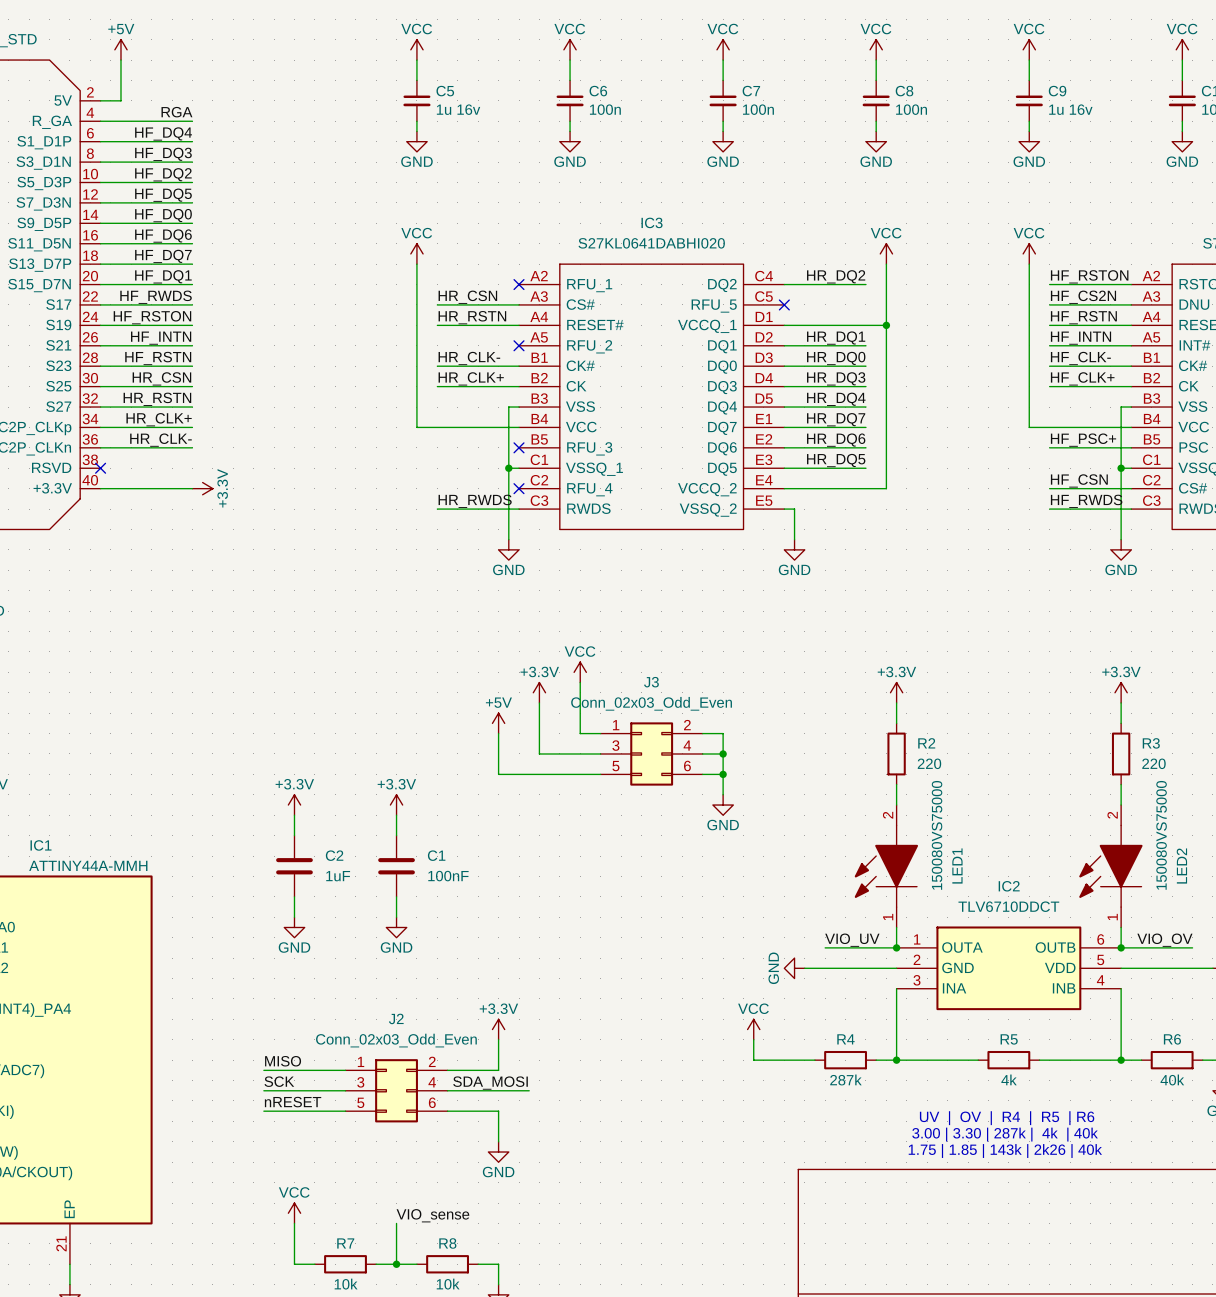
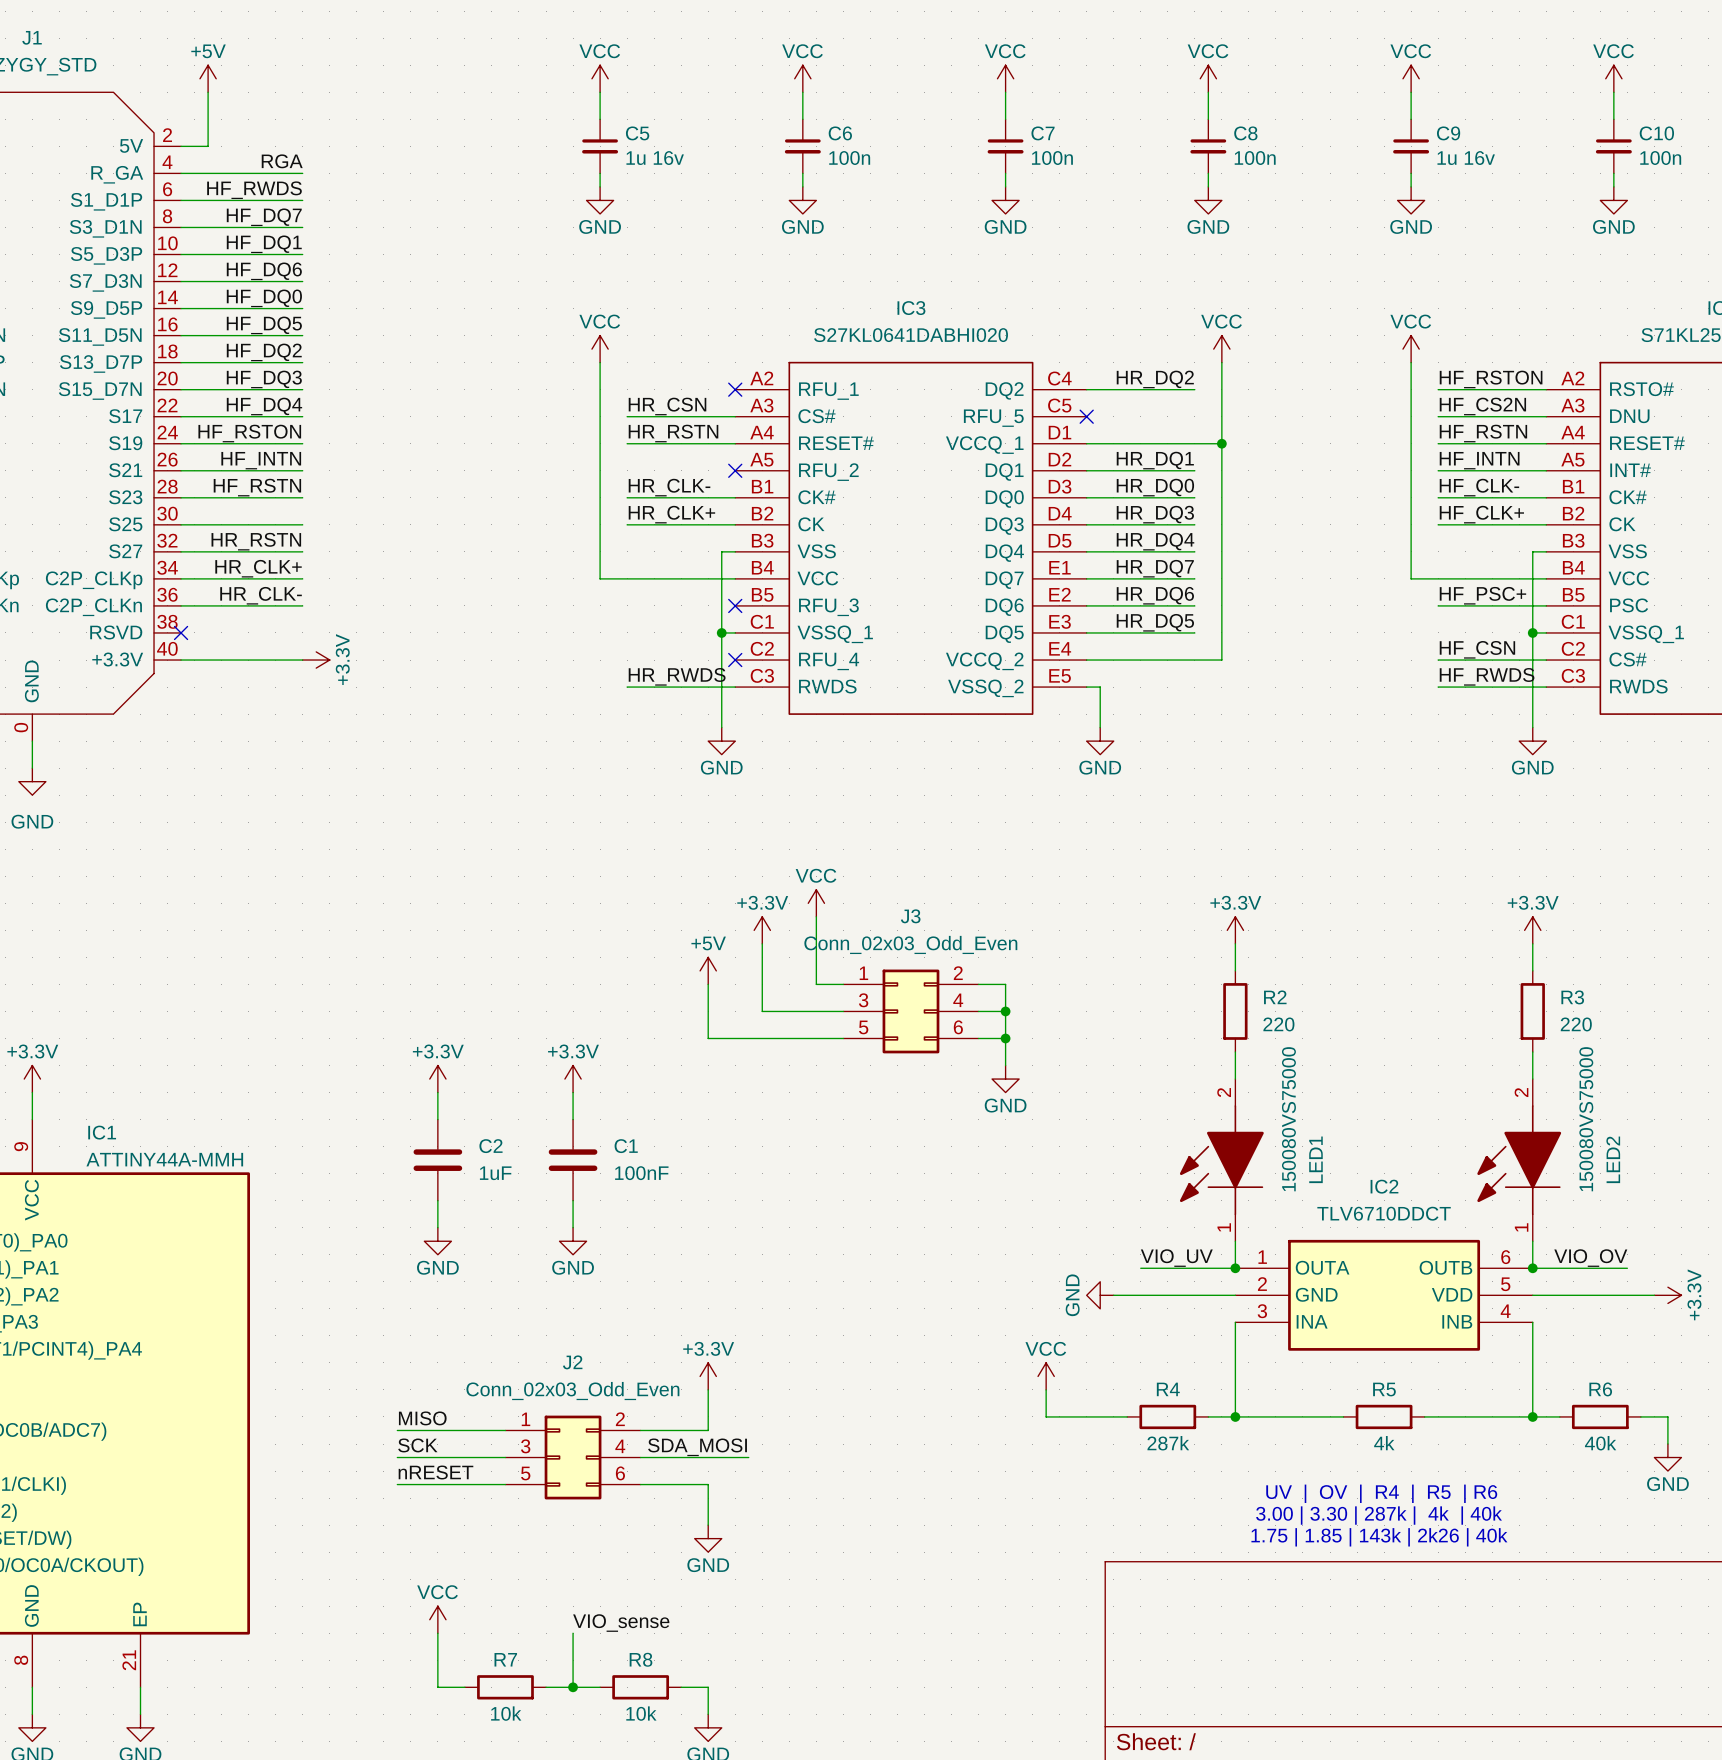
label: HF_DQ4 (163, 133) -> HF_RWDS (254, 190)
label: HF_DQ3 (163, 154) -> HF_DQ7 (264, 217)
label: HF_DQ2 (163, 174) -> HF_DQ1 (264, 244)
label: HF_DQ5 (163, 195) -> HF_DQ6 (264, 271)
label: HF_DQ6 (163, 236) -> HF_DQ5 (264, 325)
label: HF_DQ7 (163, 256) -> HF_DQ2 (264, 352)
label: HF_DQ1 (163, 276) -> HF_DQ3 (264, 379)
label: HF_RWDS (156, 297) -> HF_DQ4 (264, 406)
label: HR_CSN (161, 378) -> none

